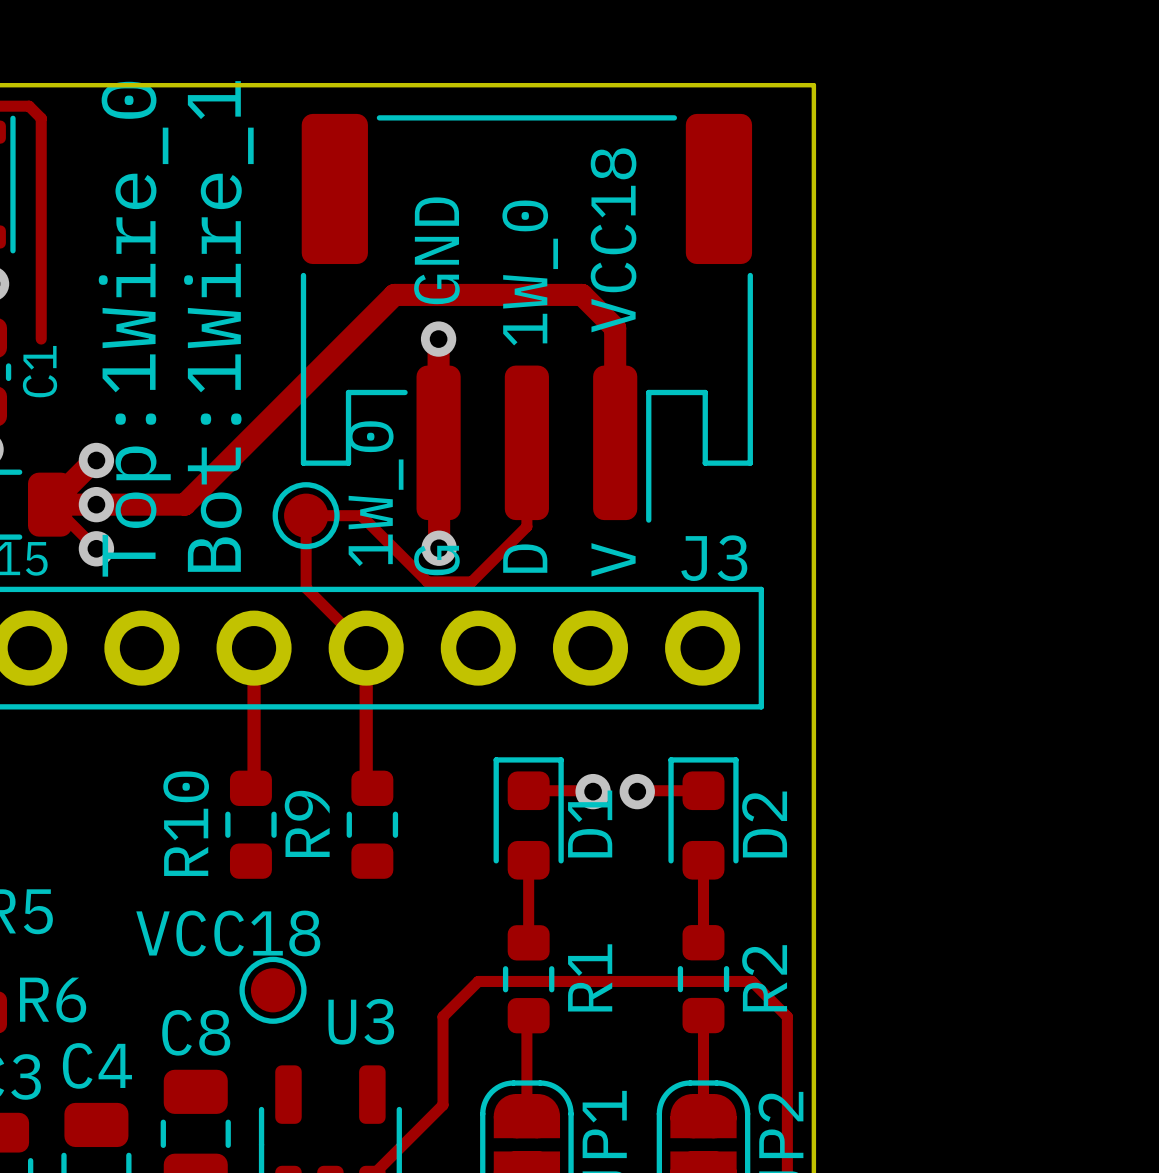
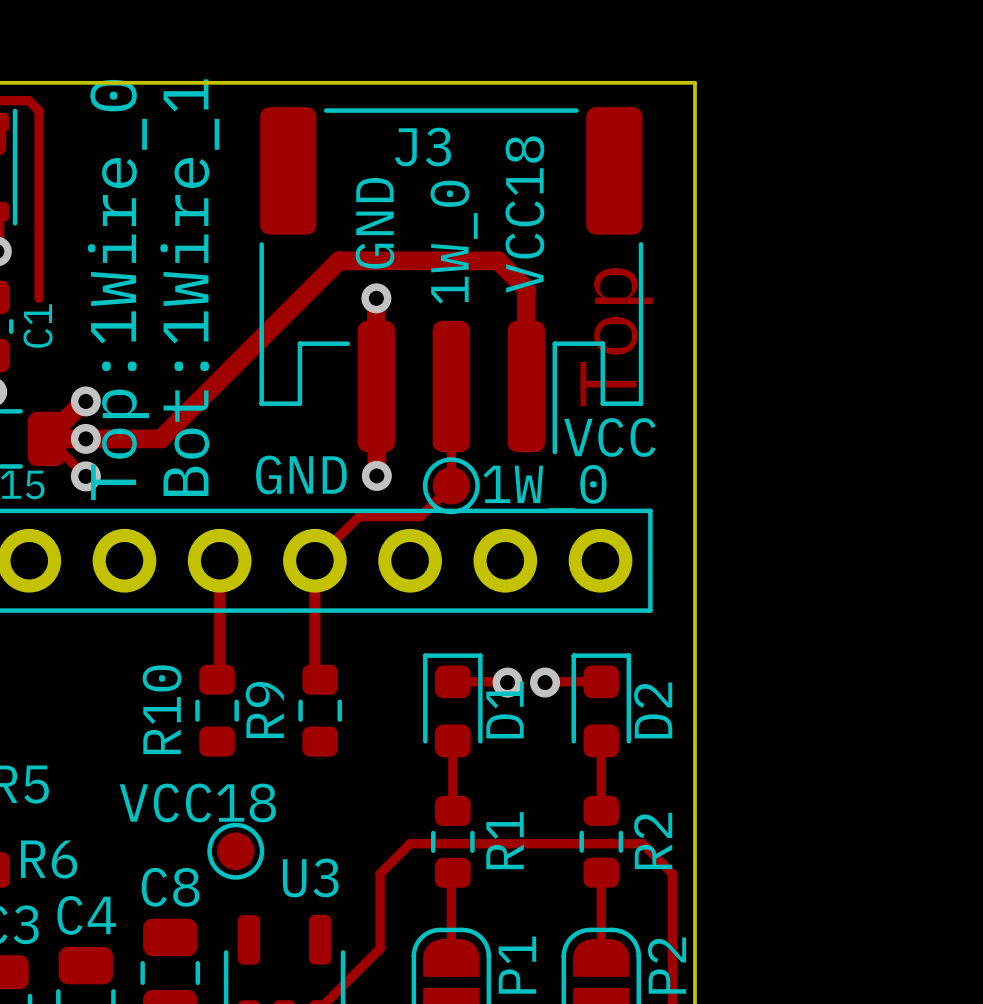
text: none -> Top (616, 337)
part value rotation: 0° (375, 493) -> 90° clockwise (544, 488)
text: none -> VCC (609, 437)
part position: (306, 515) -> (451, 485)
track: (526, 526) (471, 581) (427, 581) (361, 515) (306, 515) (306, 588) (366, 648) -> (451, 457) (451, 485) (420, 516) (358, 516) (314, 560)
text: none -> GND (301, 474)
text: D (525, 558) -> none
J3 name position: J3 (714, 558) -> J3 (423, 147)
text: V (613, 559) -> none
text: G (436, 560) -> none

